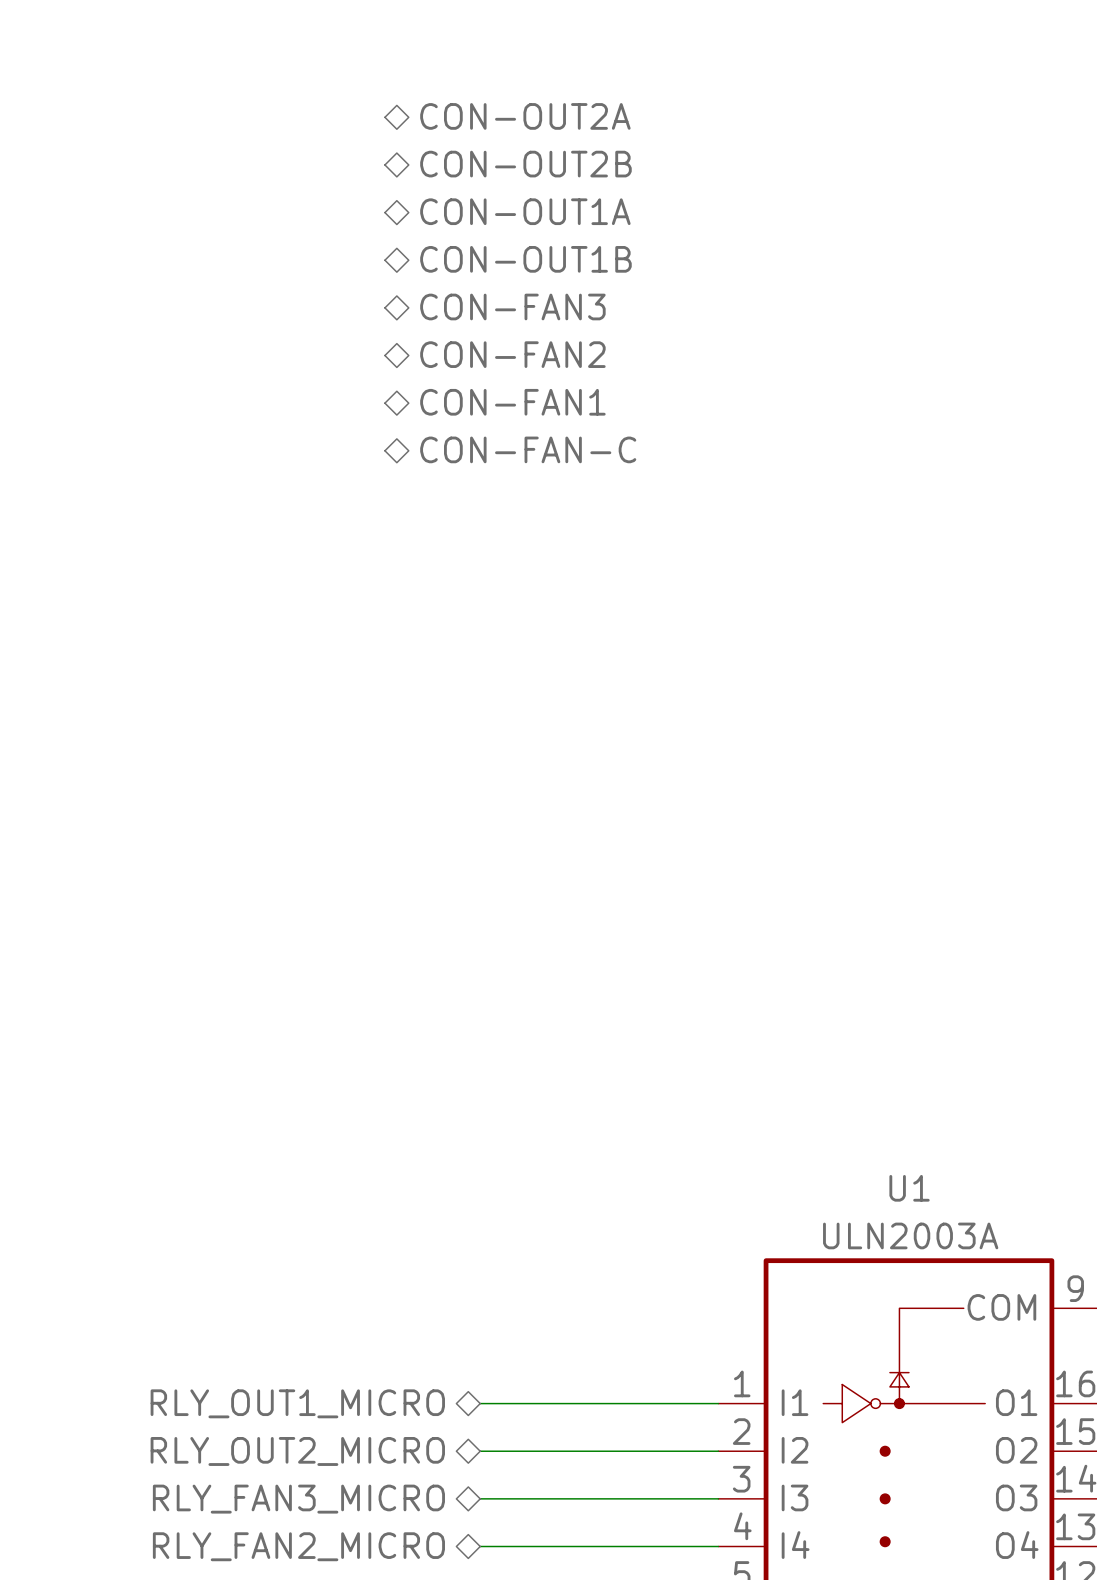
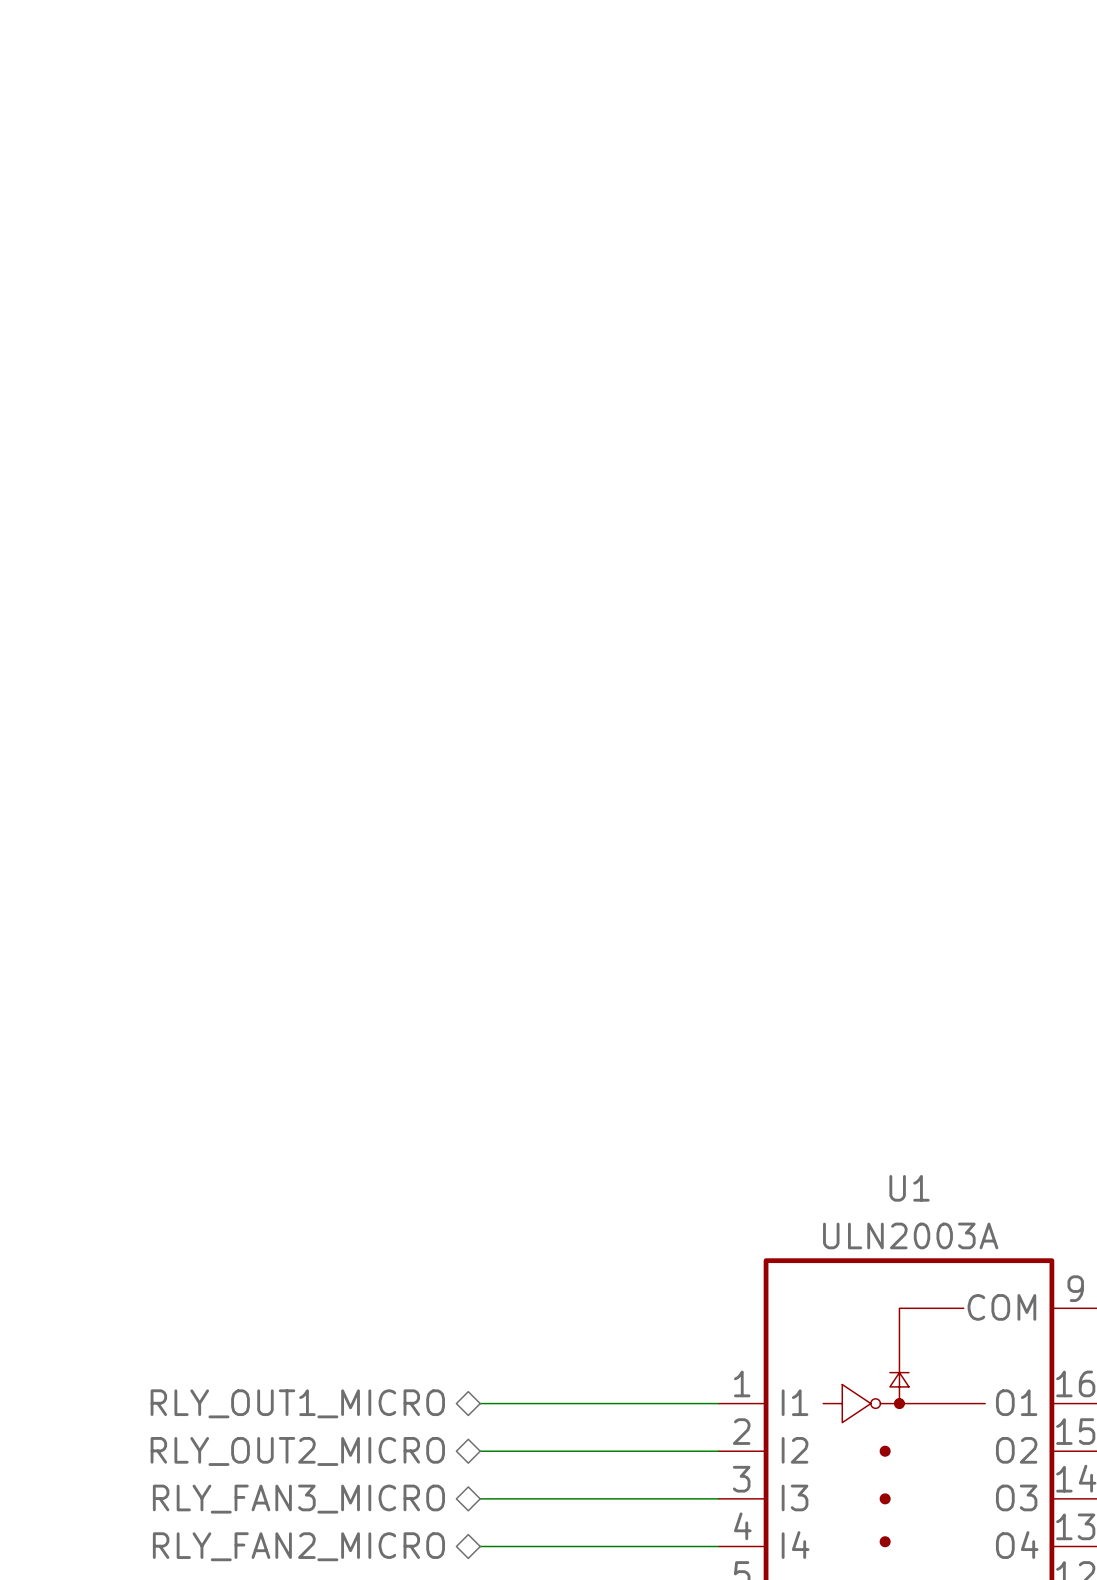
hierarchical label: CON-OUT2A (525, 116) -> none
hierarchical label: CON-OUT2B (525, 164) -> none
hierarchical label: CON-OUT1A (525, 211) -> none
hierarchical label: CON-OUT1B (525, 259) -> none
hierarchical label: CON-FAN3 (512, 306) -> none
hierarchical label: CON-FAN2 (512, 354) -> none
hierarchical label: CON-FAN1 (512, 402) -> none
hierarchical label: CON-FAN-C (528, 449) -> none

